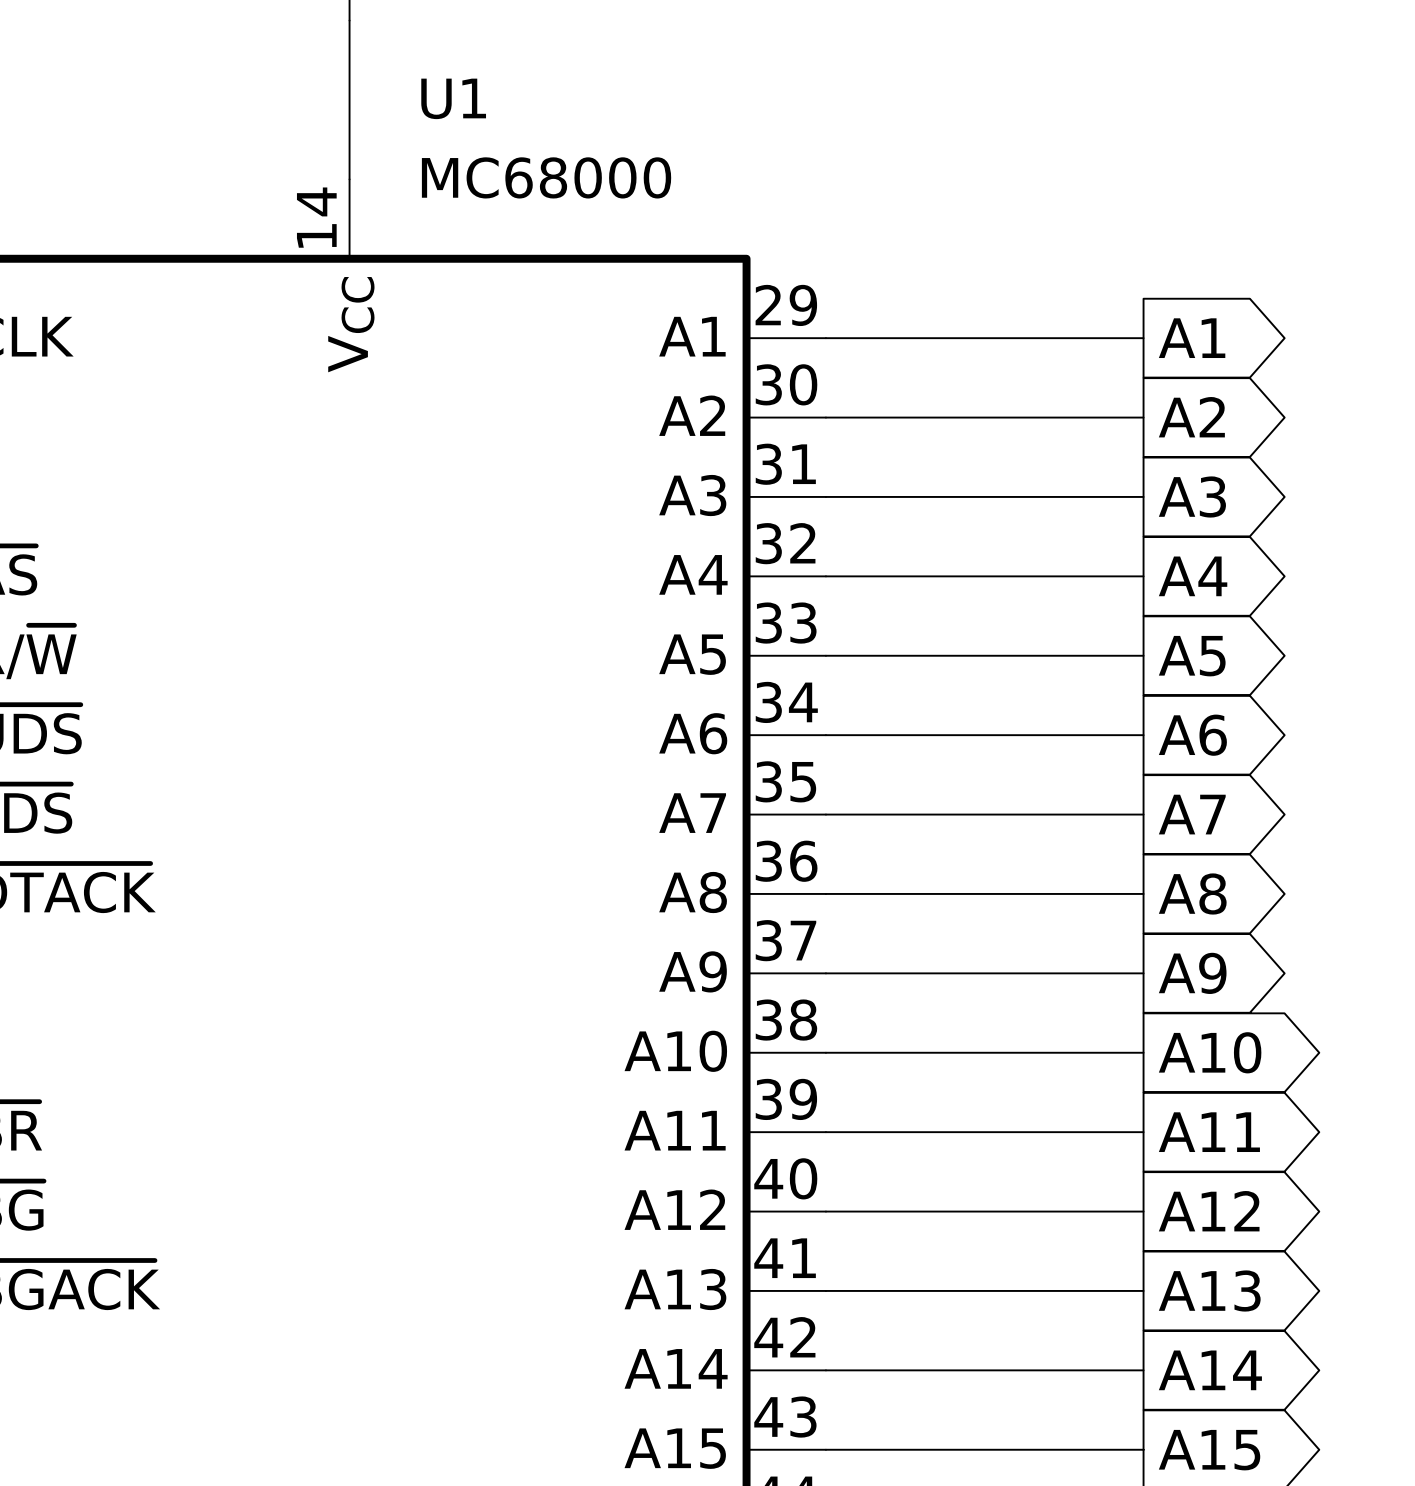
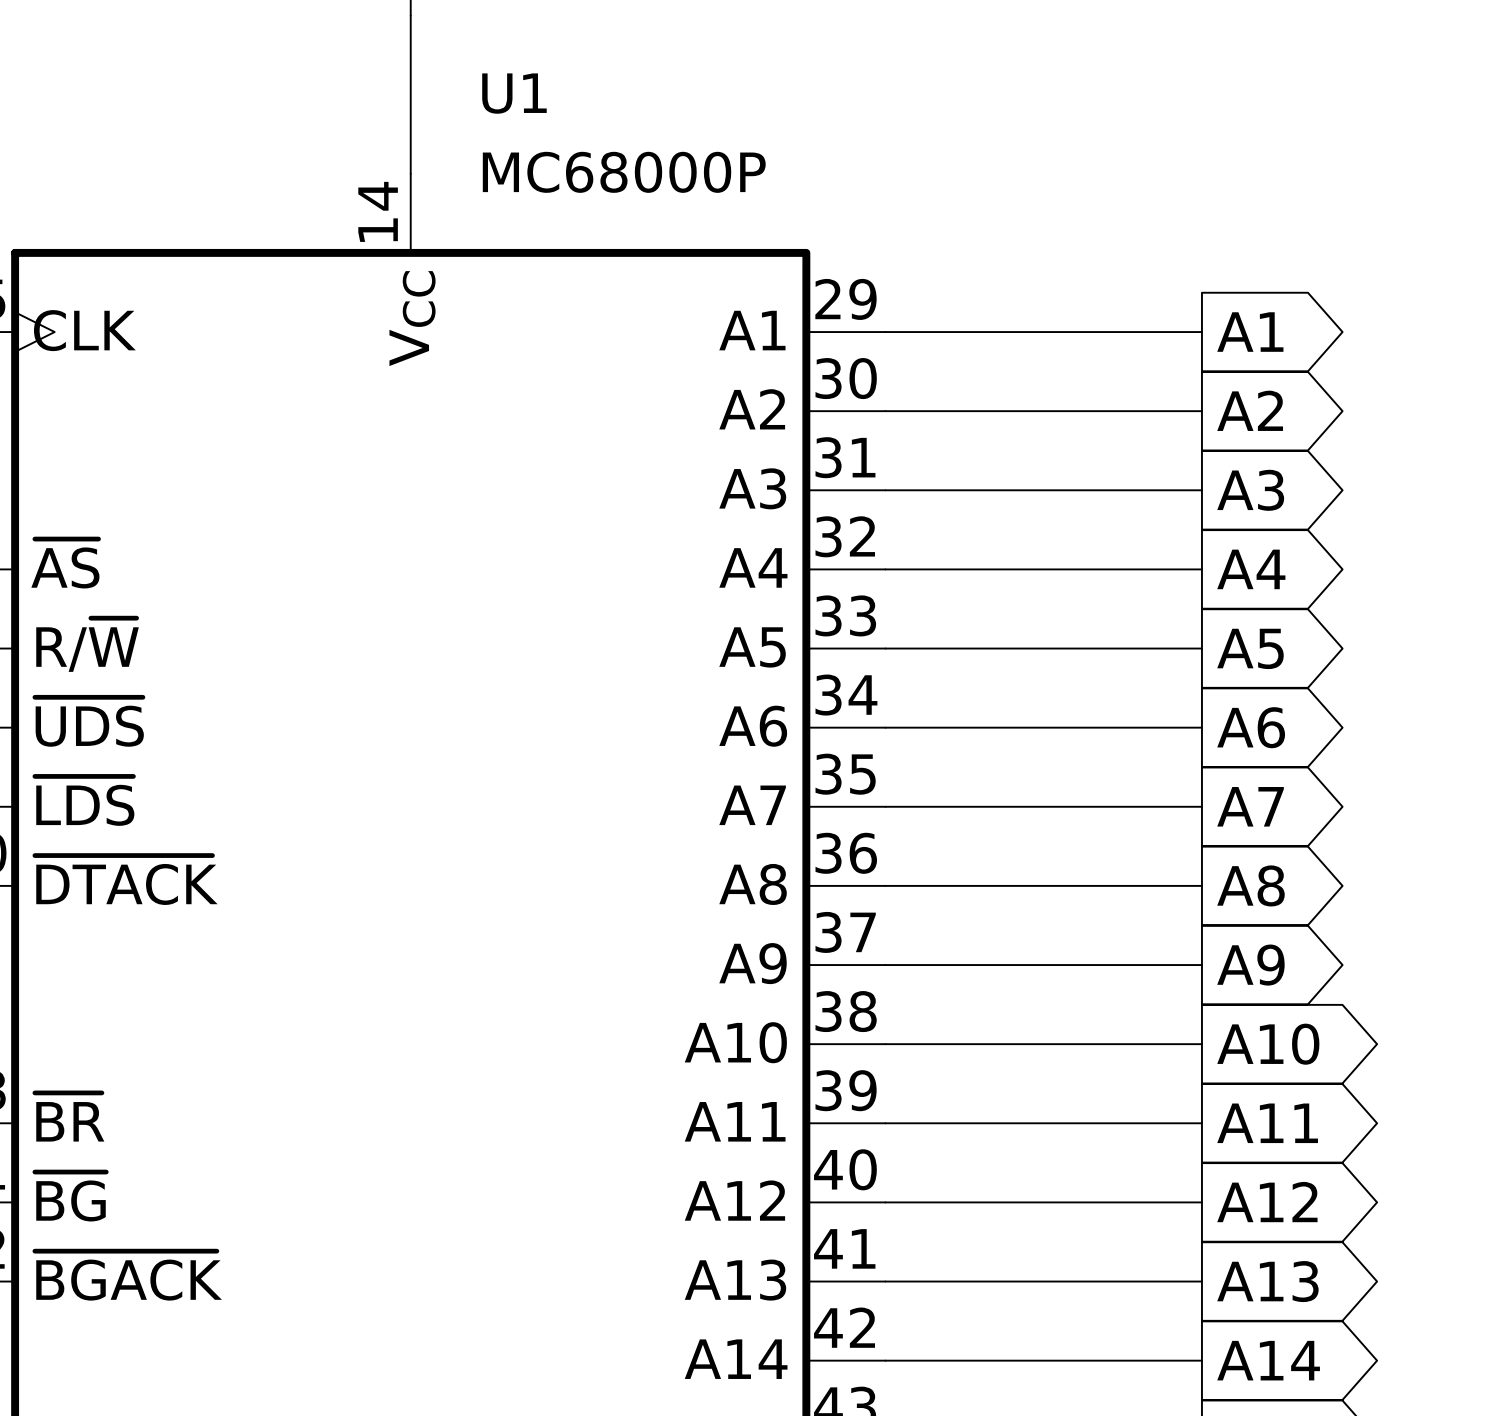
U1 value: MC68000 (546, 177) -> MC68000P (624, 172)

